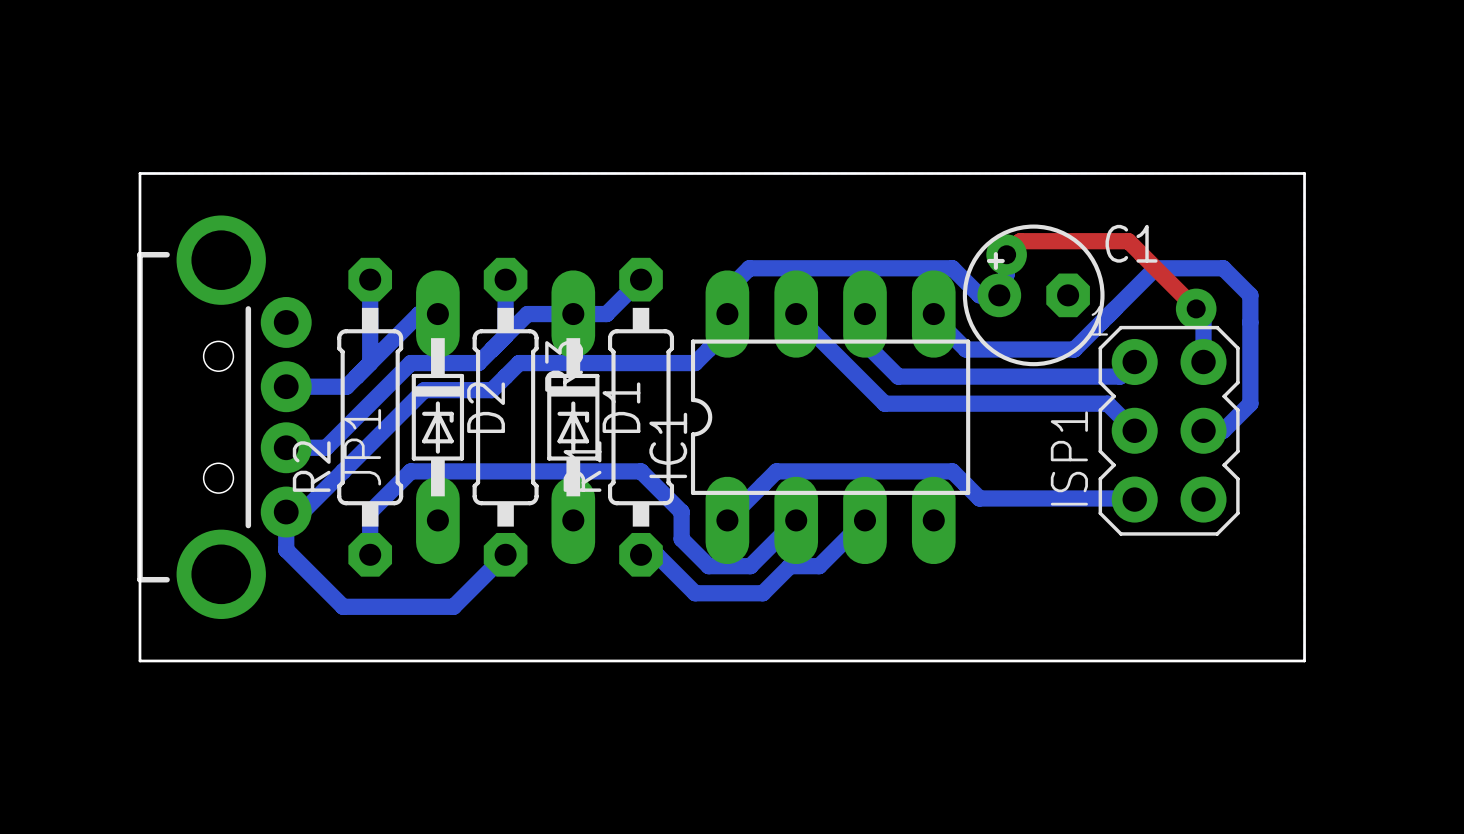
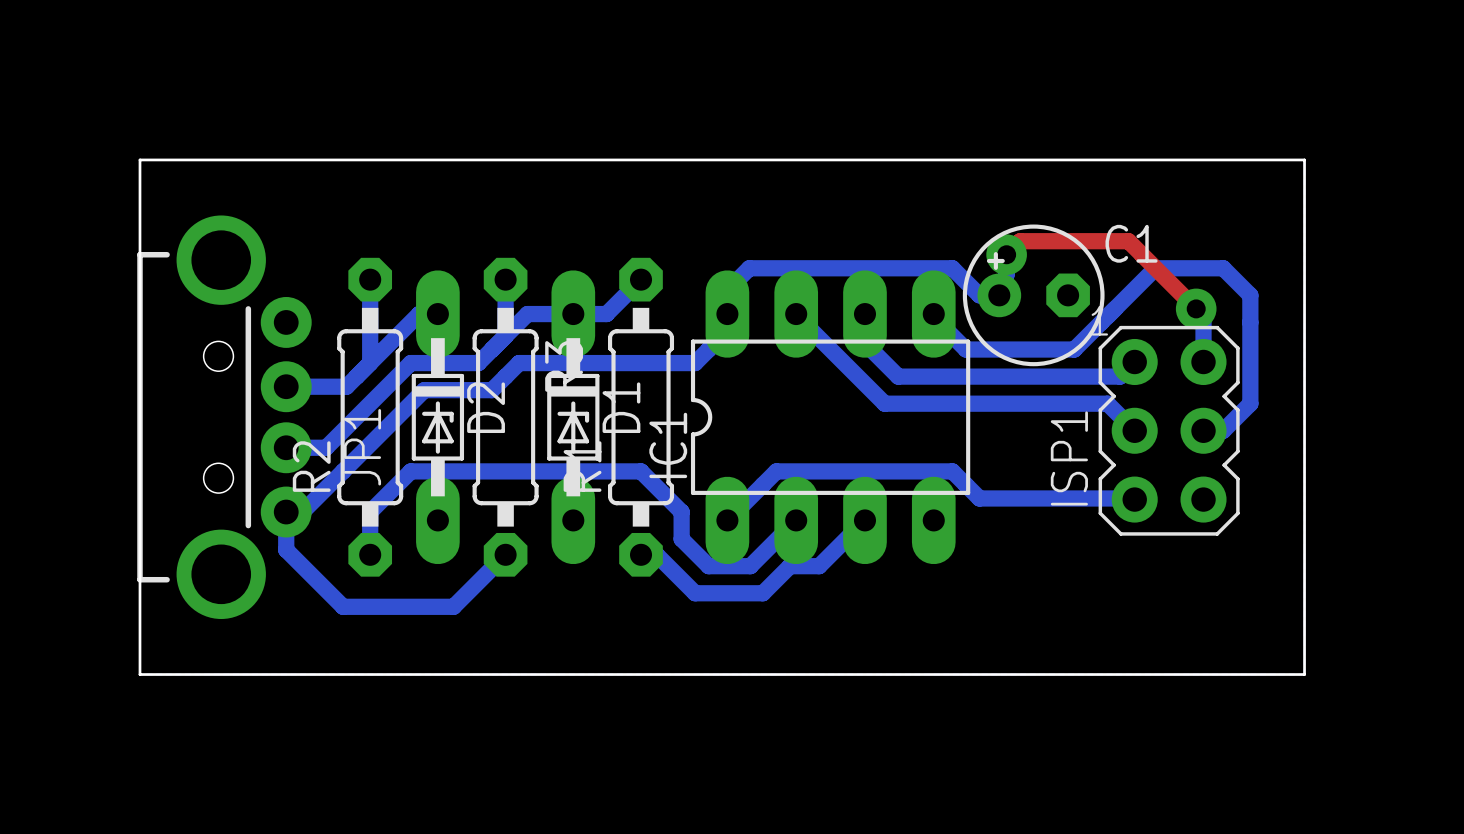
board edge: (139, 173) (1304, 173) -> (139, 173) (139, 159) (1304, 159) (1304, 173)
board edge: (139, 660) (1304, 660) -> (139, 660) (139, 674) (1304, 674) (1304, 660)

